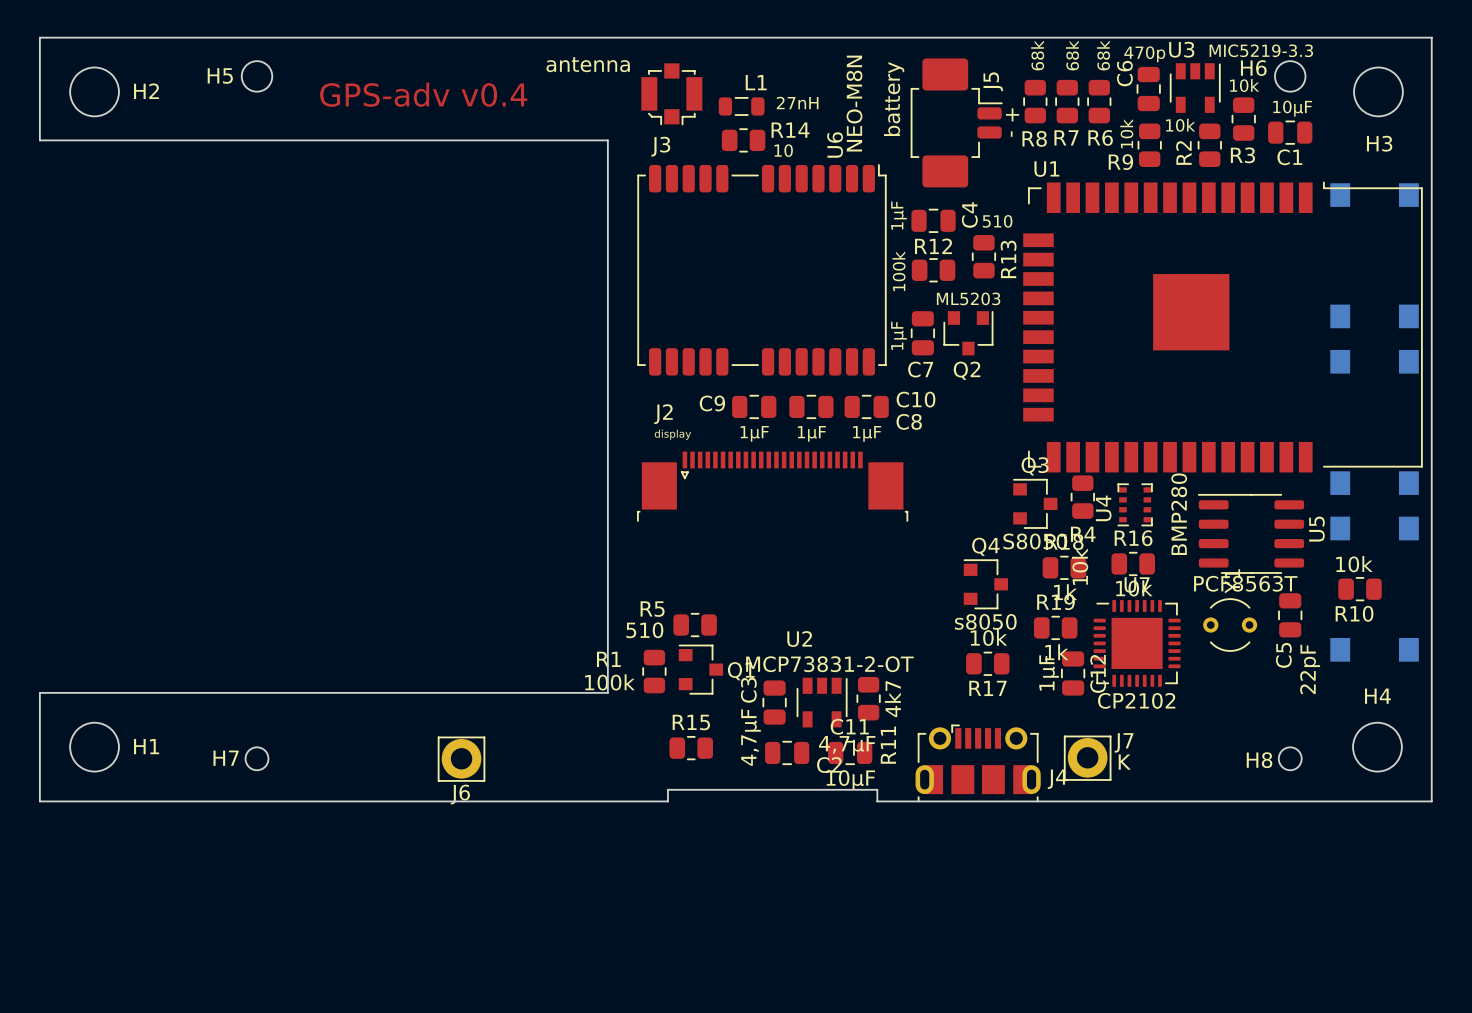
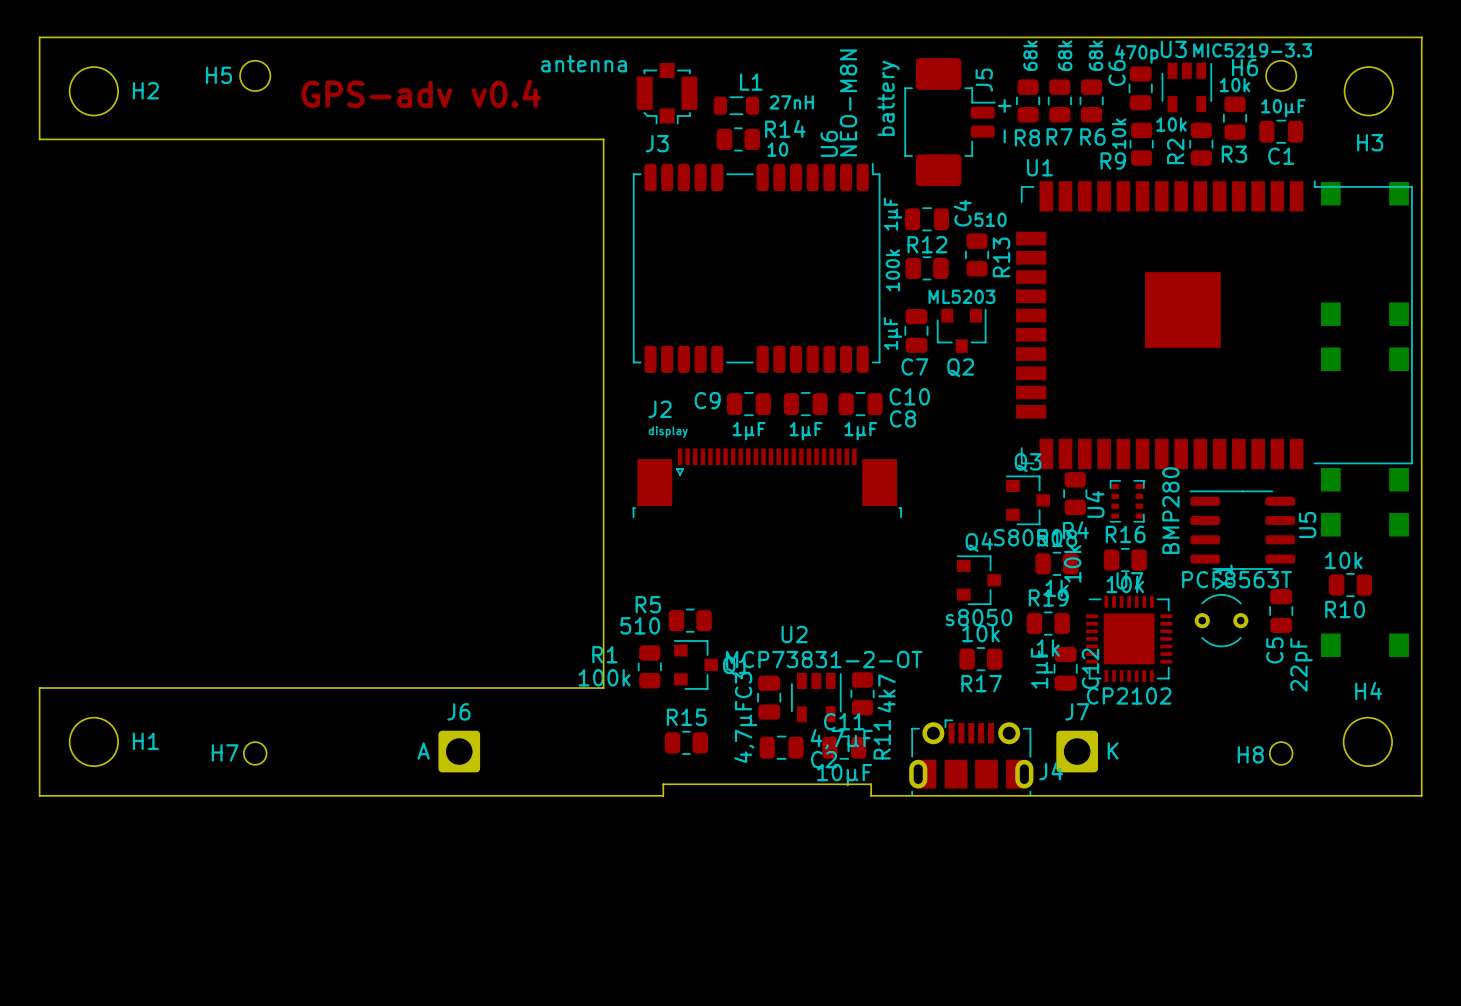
J7 footprint: [1063, 735, 1112, 781] -> [1056, 730, 1099, 773]
J6 footprint: [437, 736, 486, 782] -> [438, 730, 481, 773]
J7 name position: J7 (1124, 742) -> J7 (1077, 711)
J6 value: none -> A (423, 750)
J6 name position: J6 (460, 794) -> J6 (458, 711)

